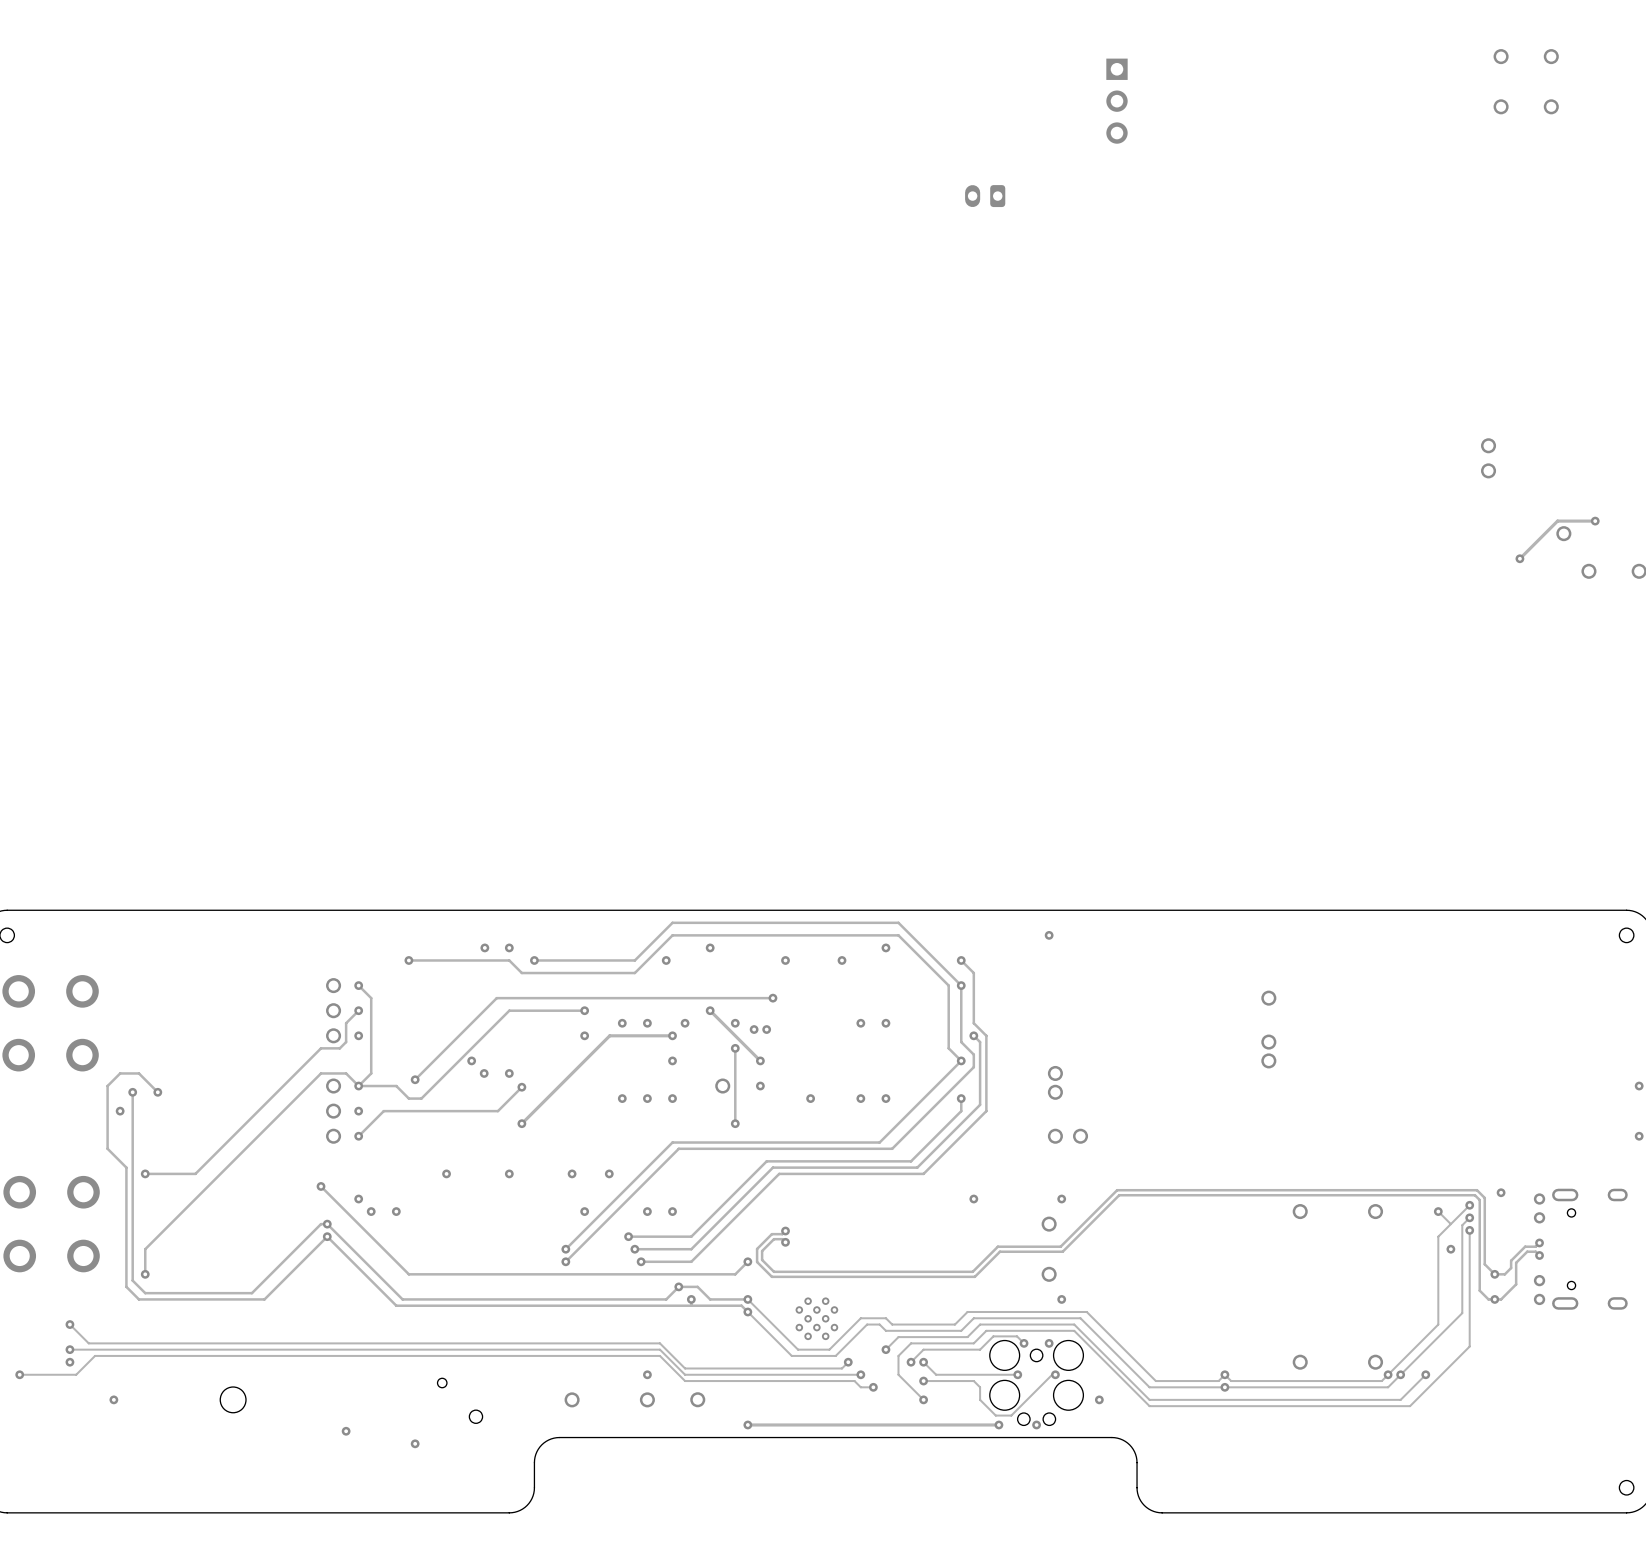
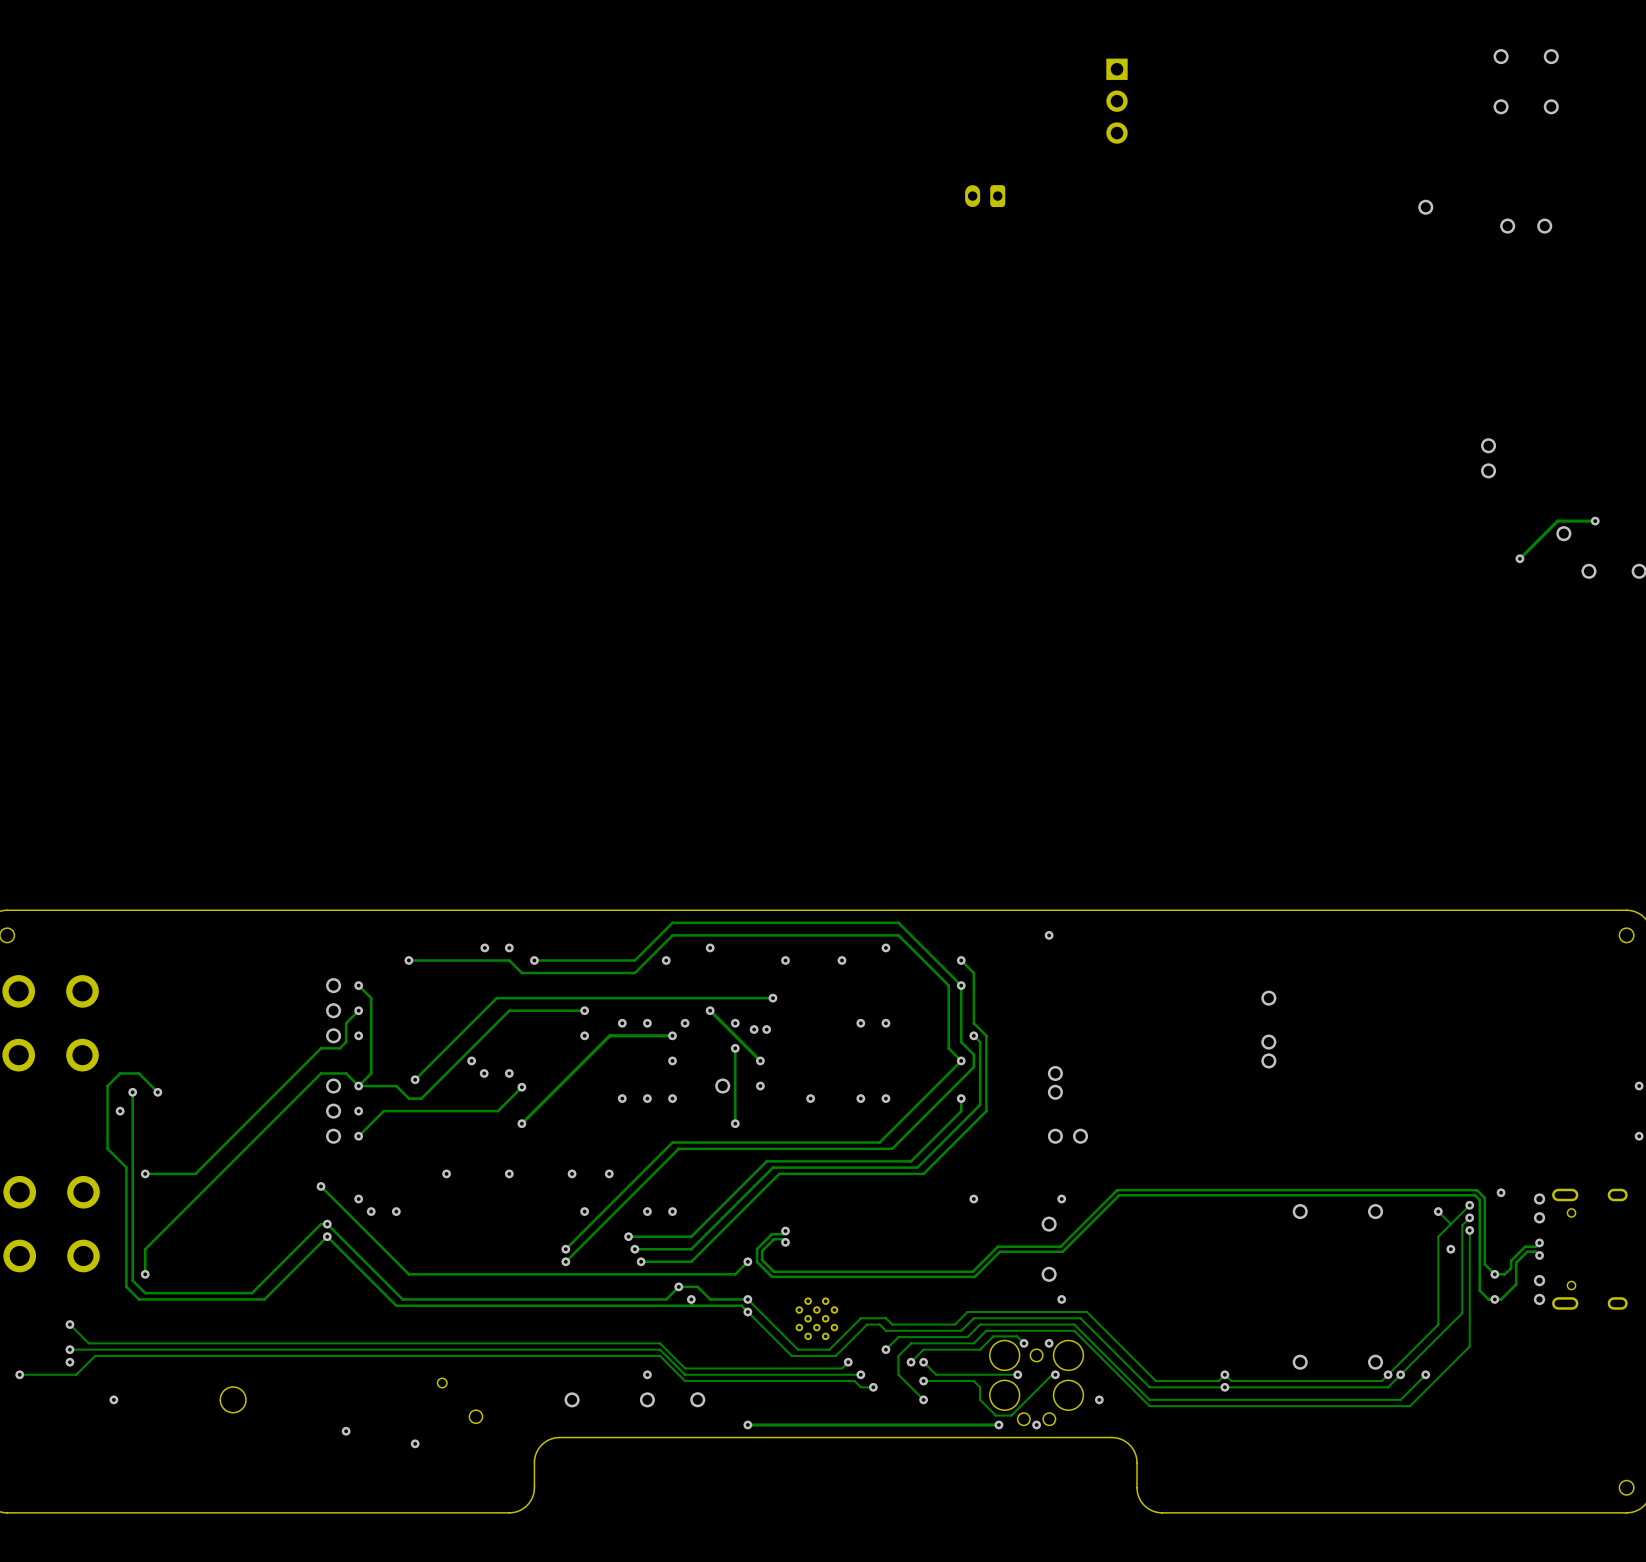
via: none -> (1425, 207)
via: none -> (1507, 226)
via: none -> (1544, 226)

